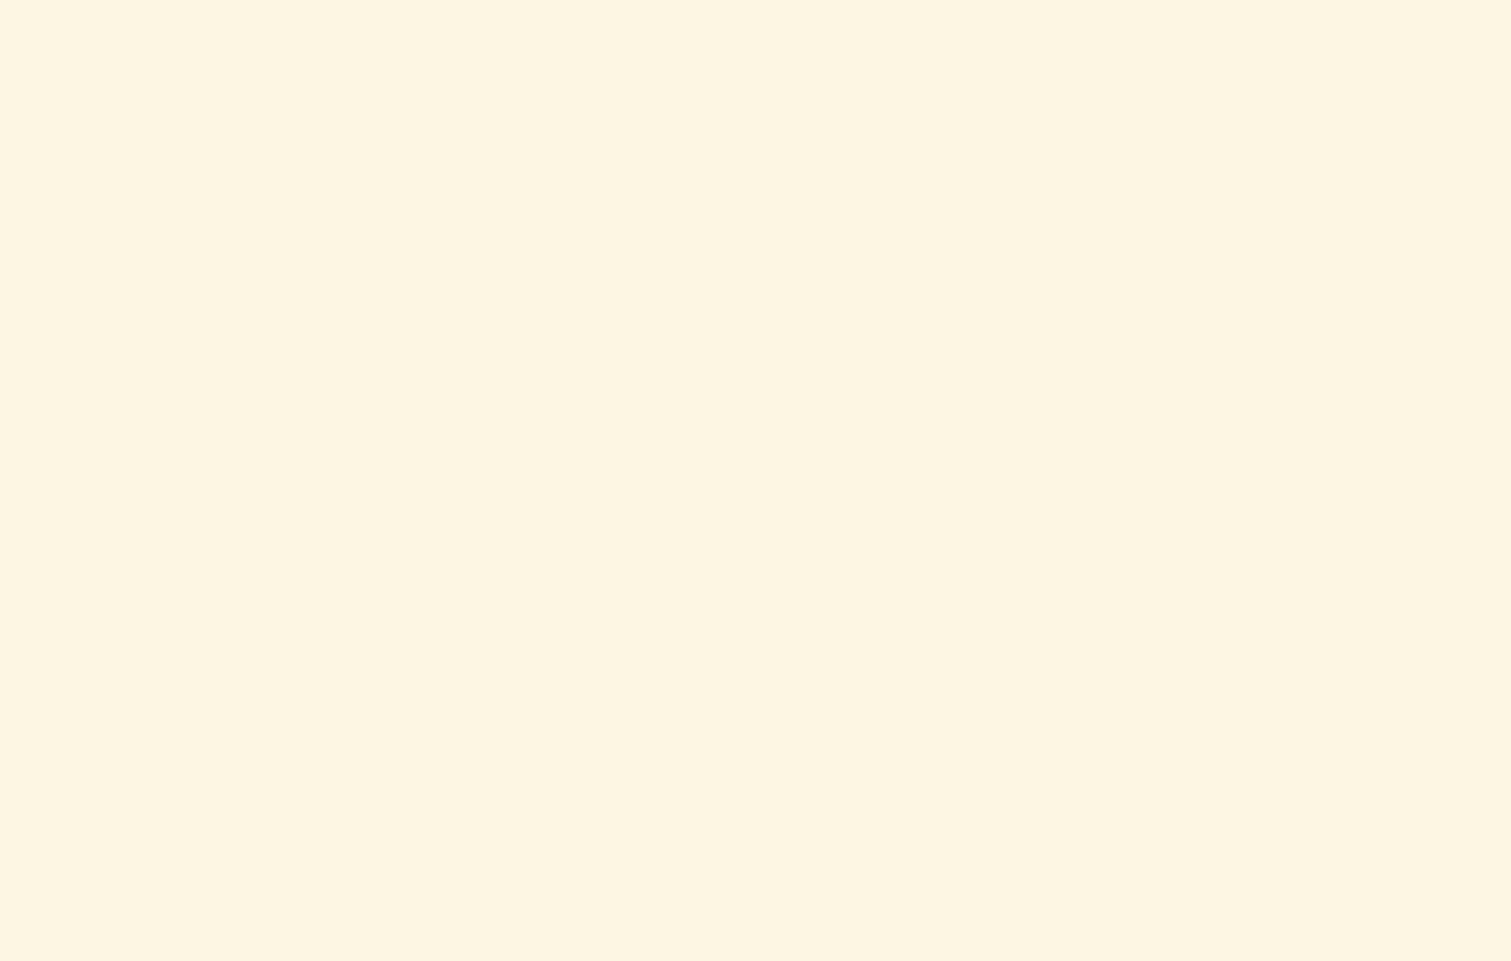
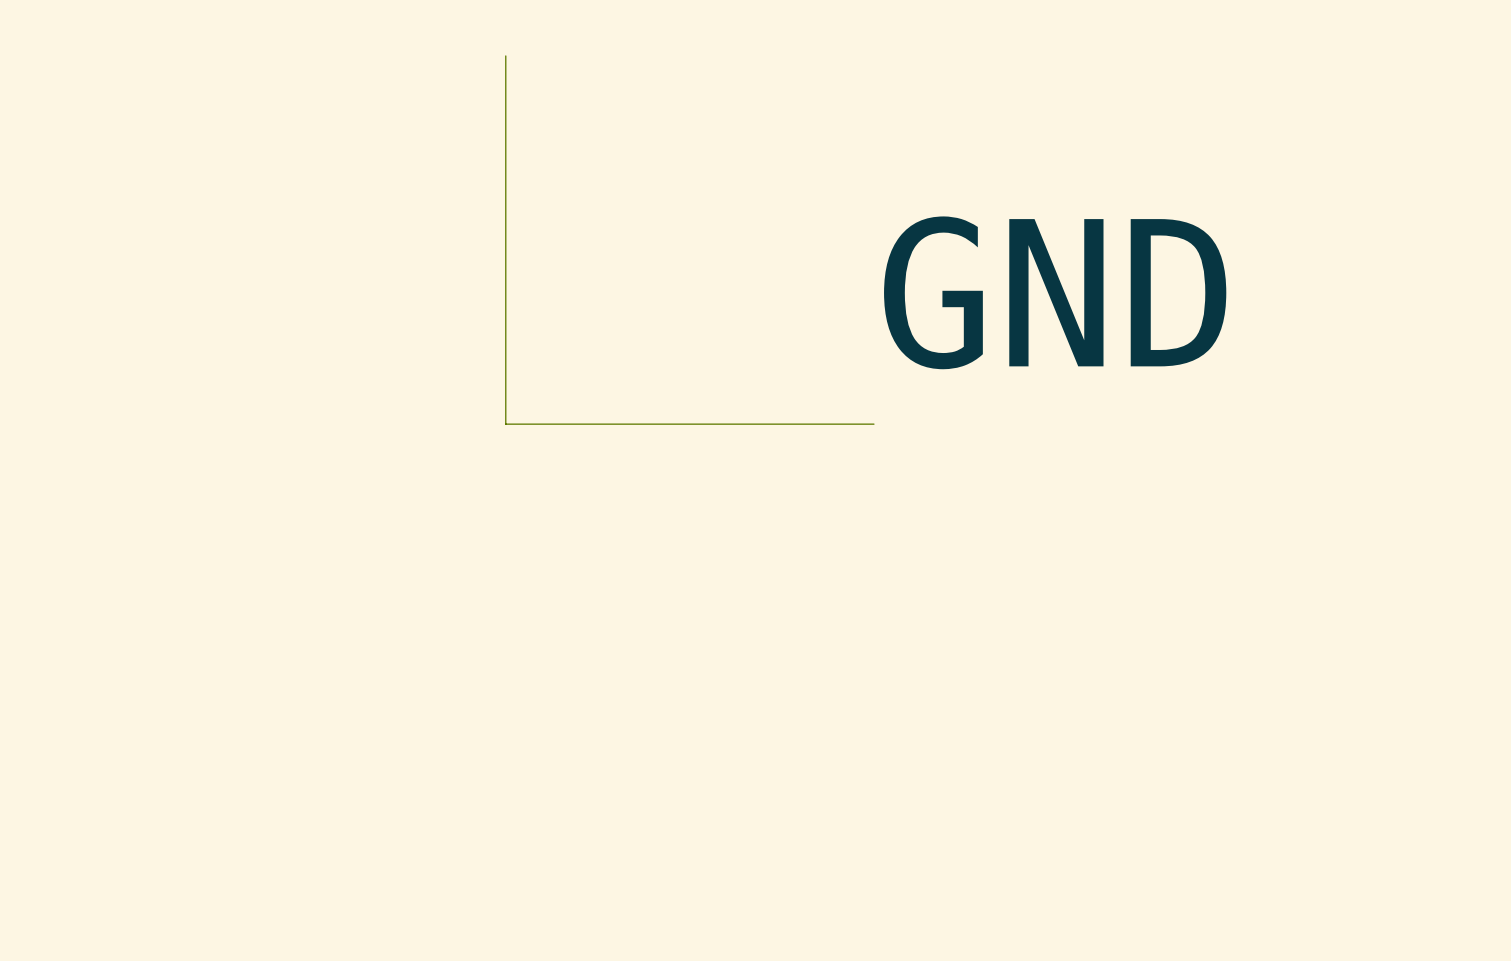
wire: none -> (505, 55) (505, 424) (873, 424)
label: none -> GND (1055, 292)

